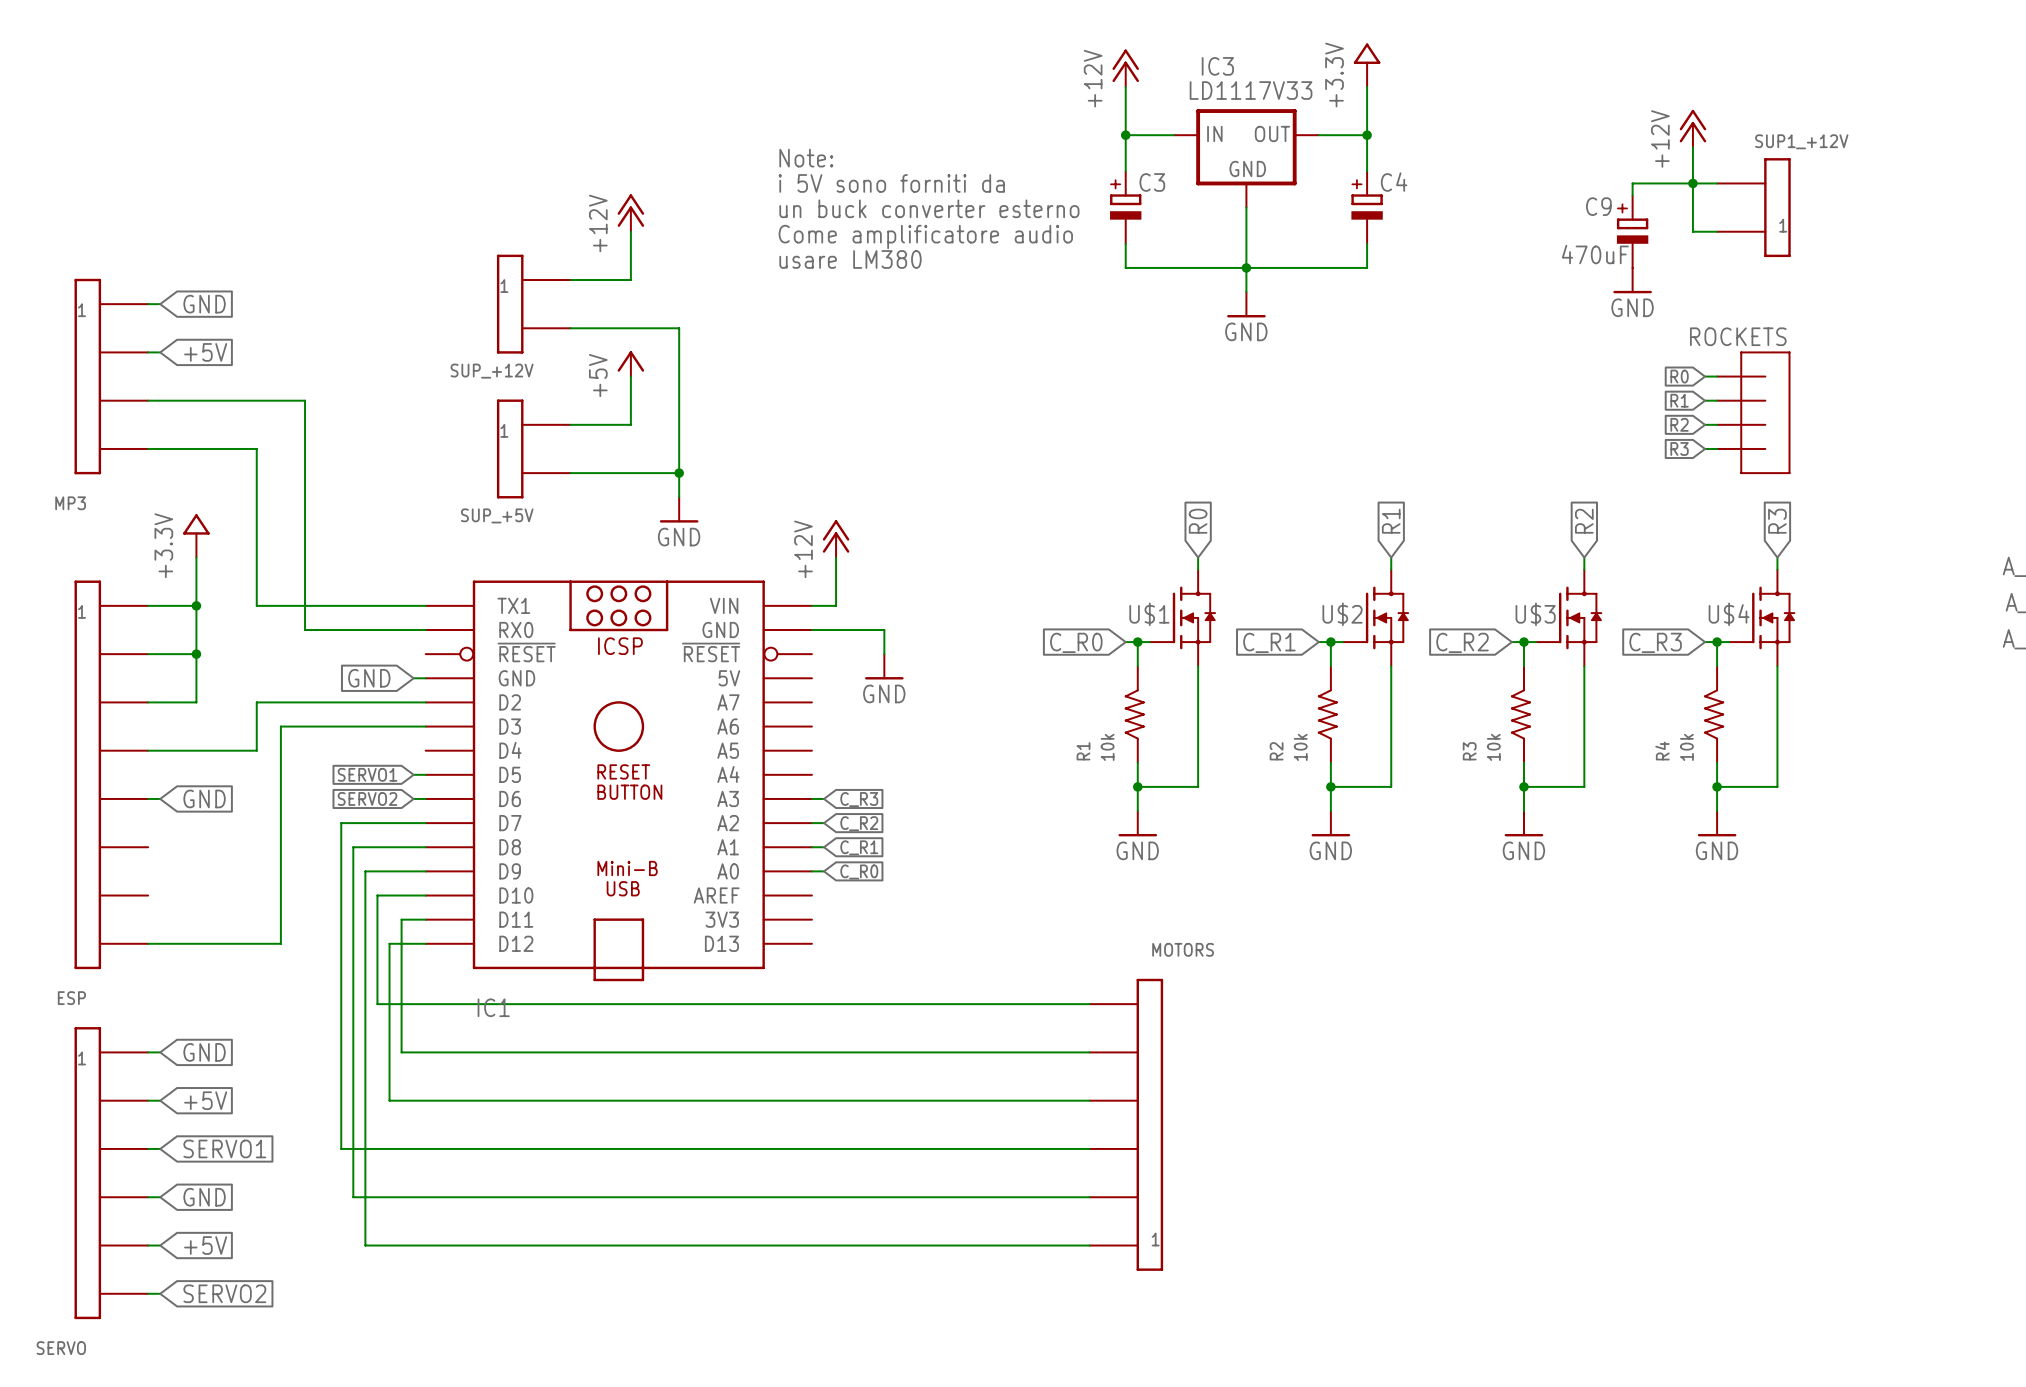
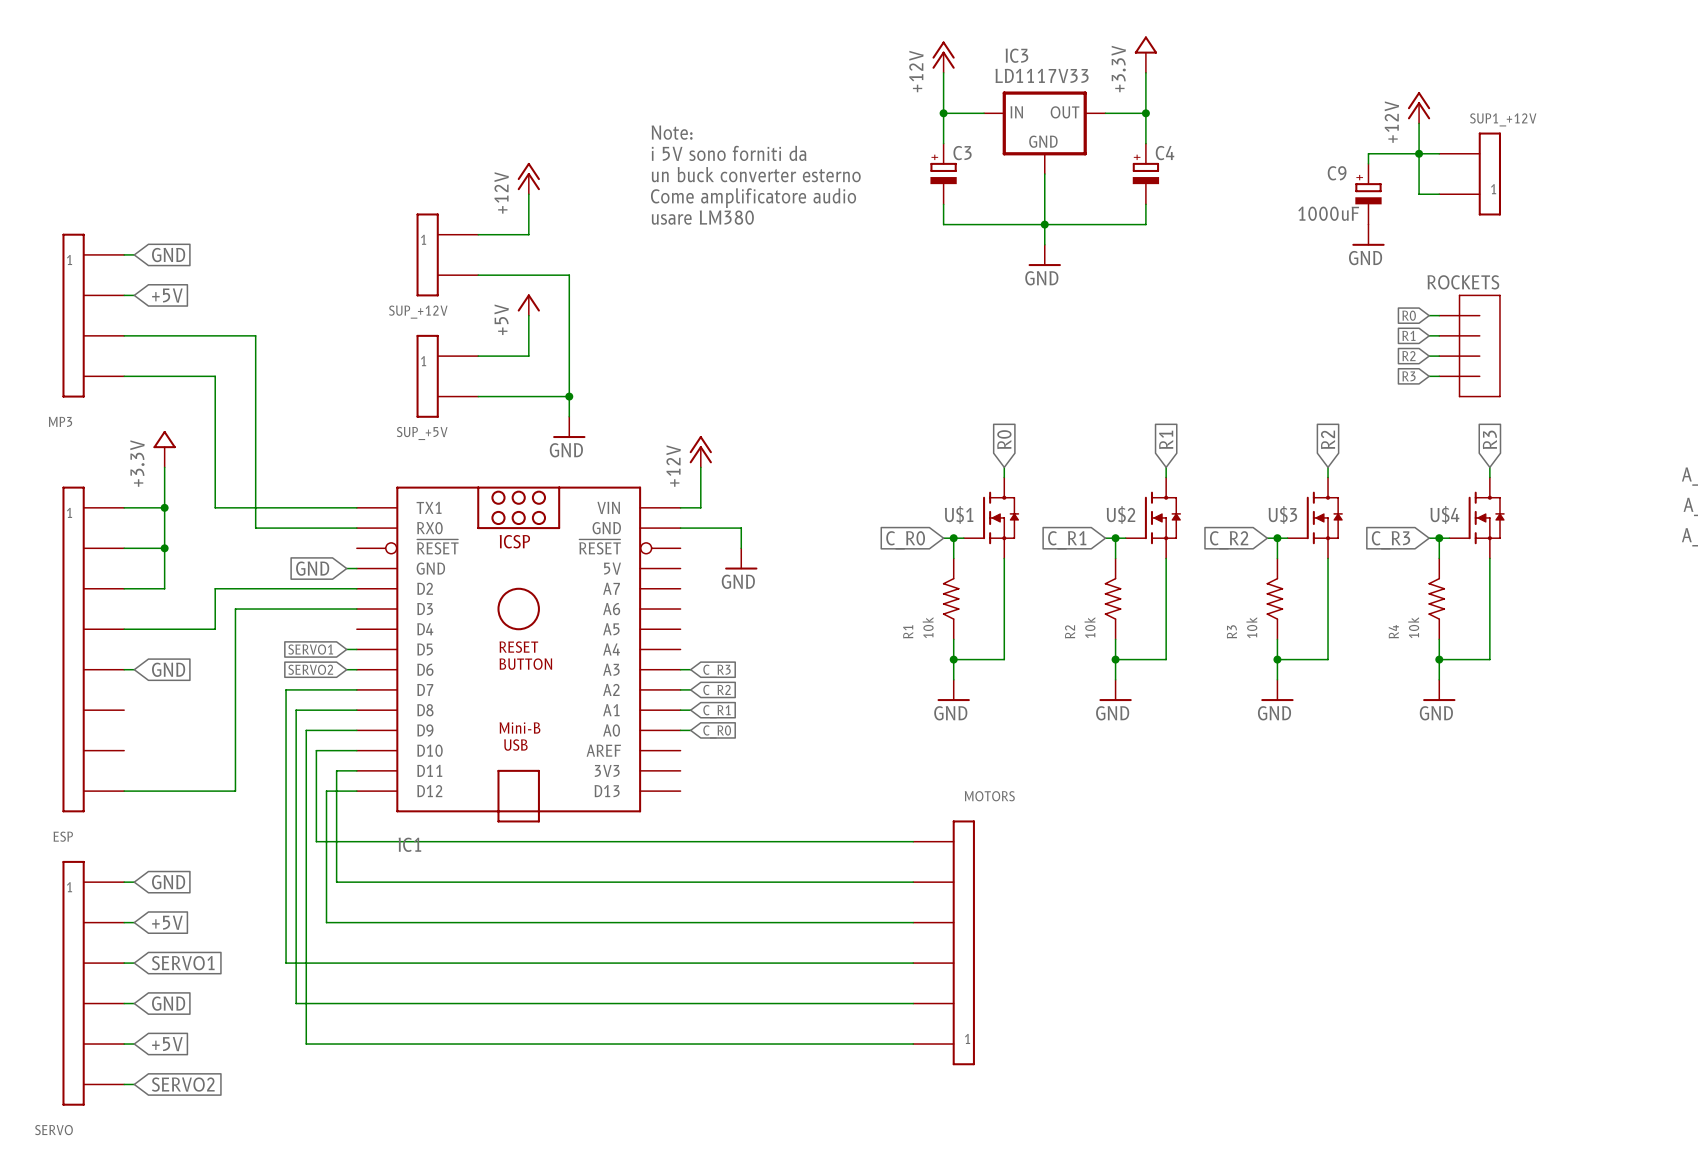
C9 value: 470uF (1595, 254) -> 1000uF (1328, 213)

